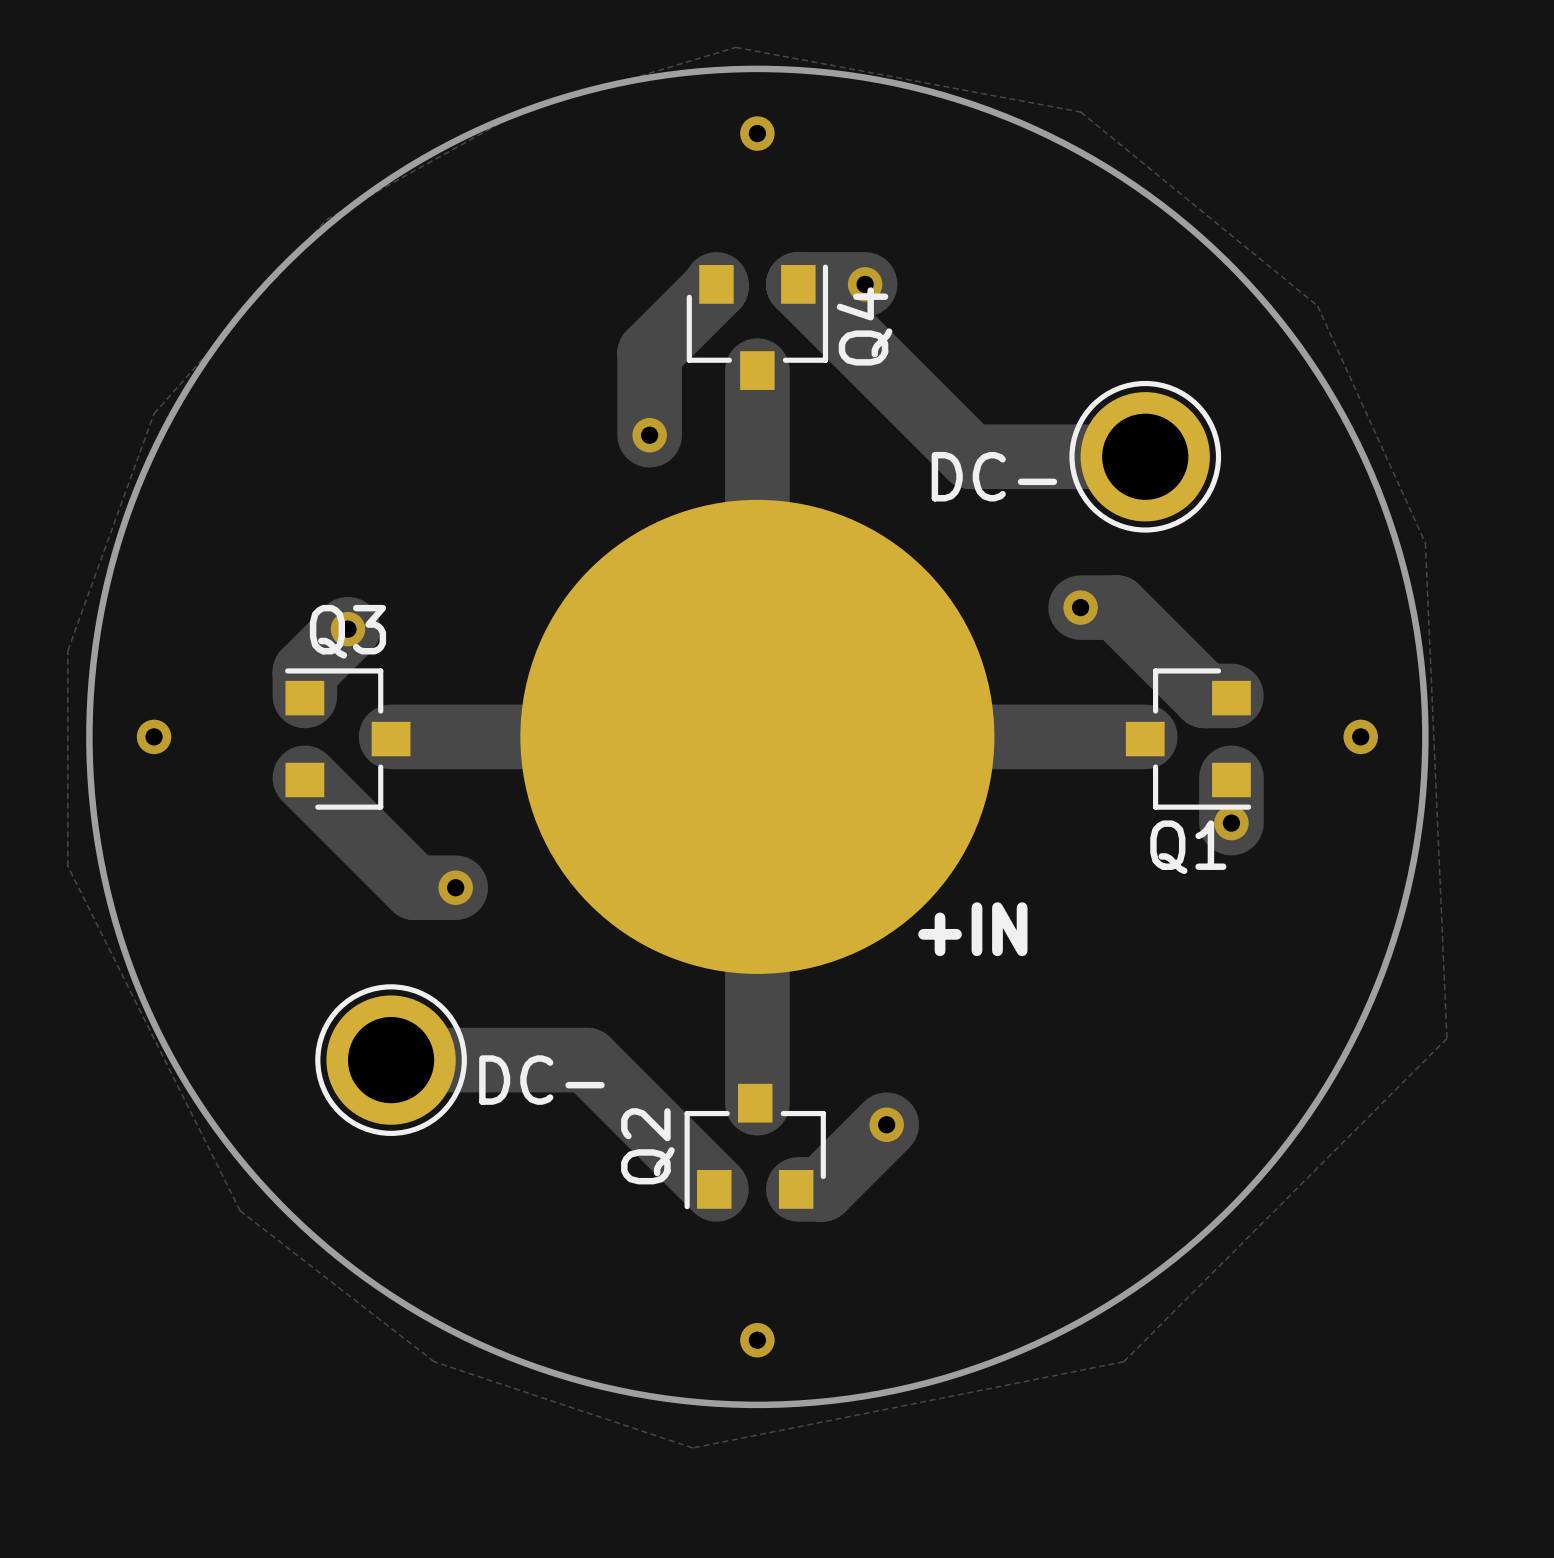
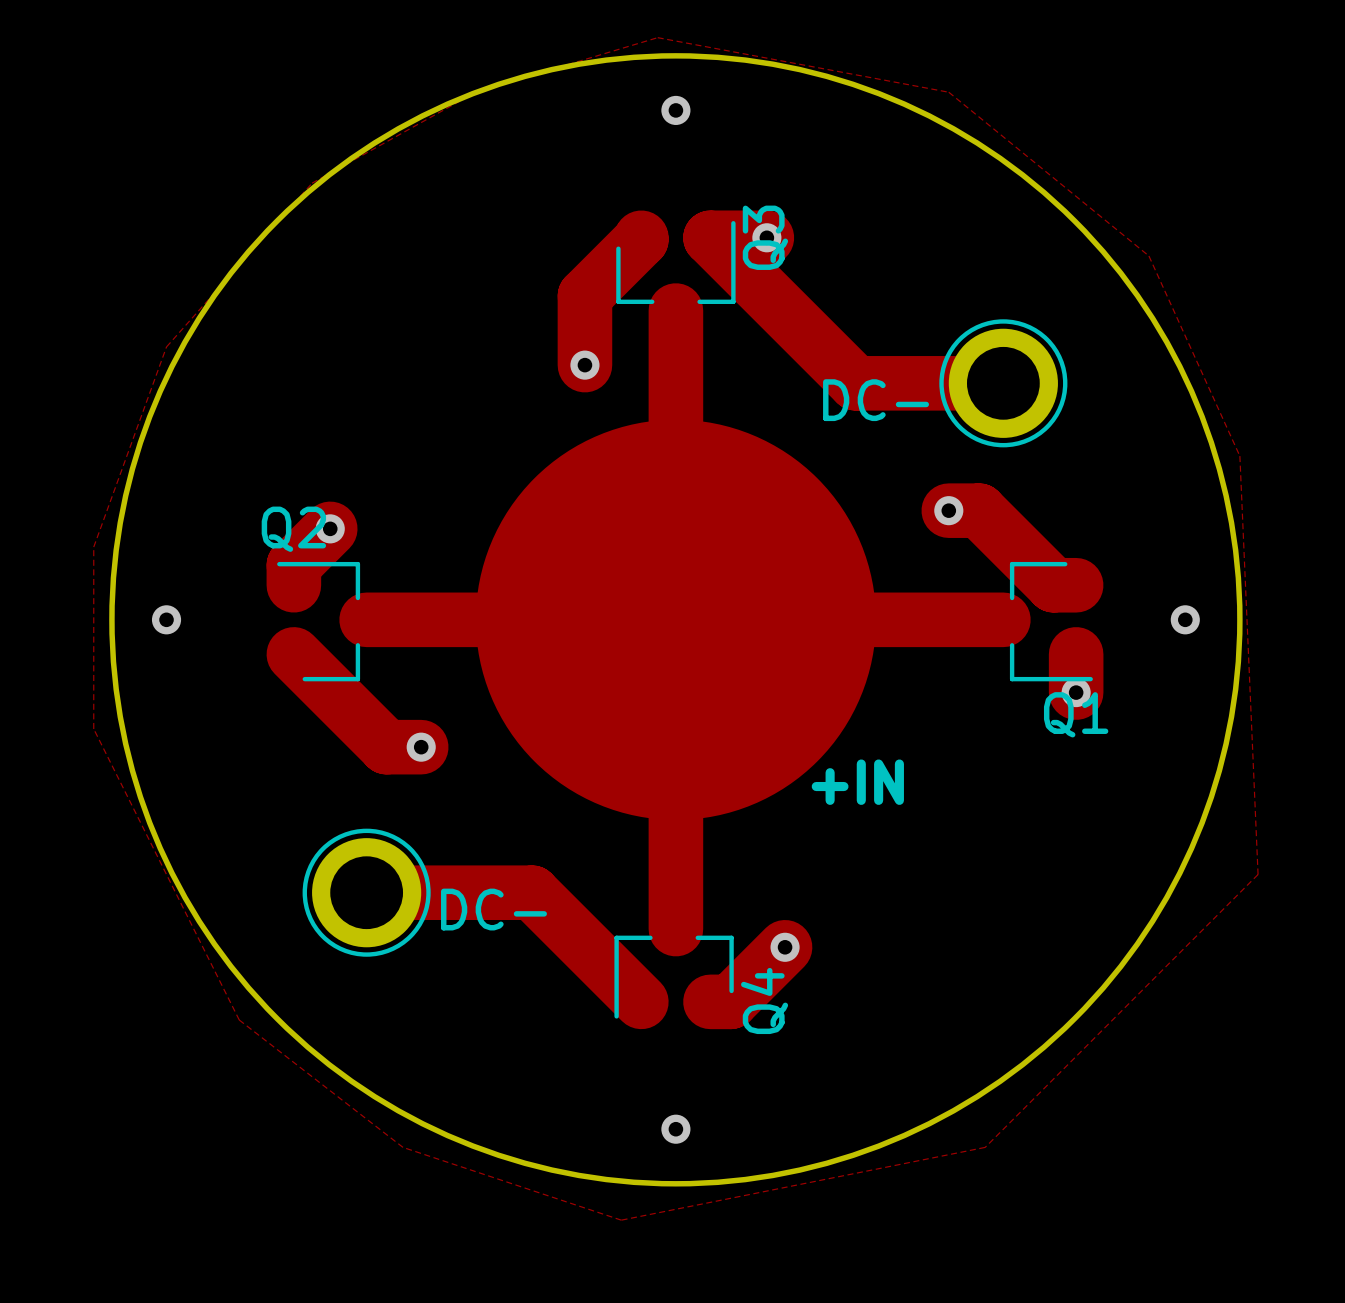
Q4 name: Q4 (864, 326) -> Q3 (765, 237)
Q3 name: Q3 (347, 631) -> Q2 (293, 529)
Q1 name position: Q1 (1188, 847) -> Q1 (1076, 714)
Q2 name: Q2 (647, 1146) -> Q4 (764, 1001)

